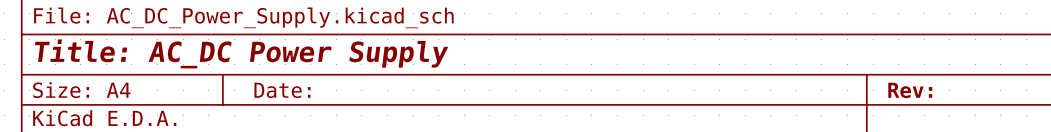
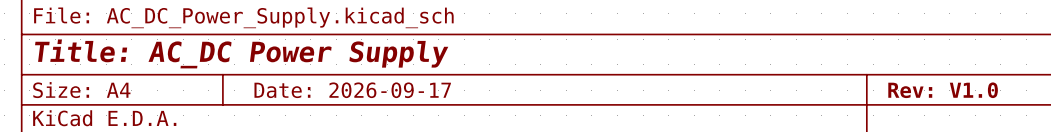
title block: Date: (282, 90) -> Date: 2026-09-17 (352, 90)
title block: Rev: (910, 90) -> Rev: V1.0 (943, 90)

